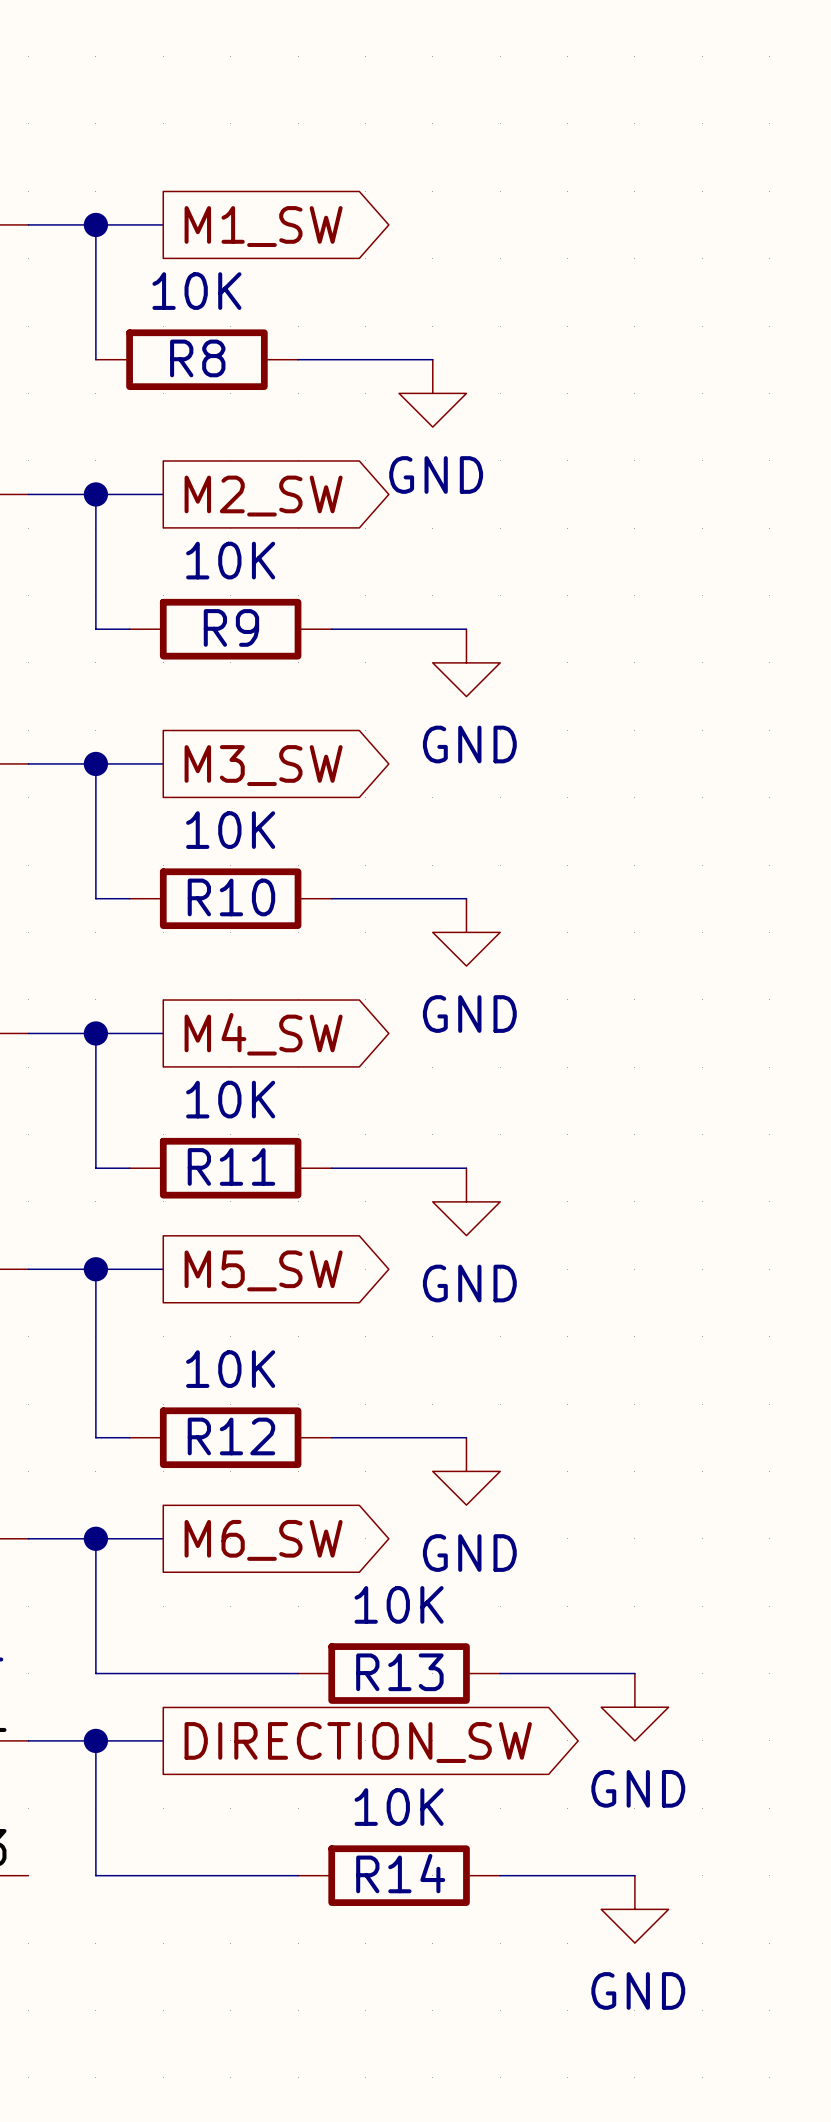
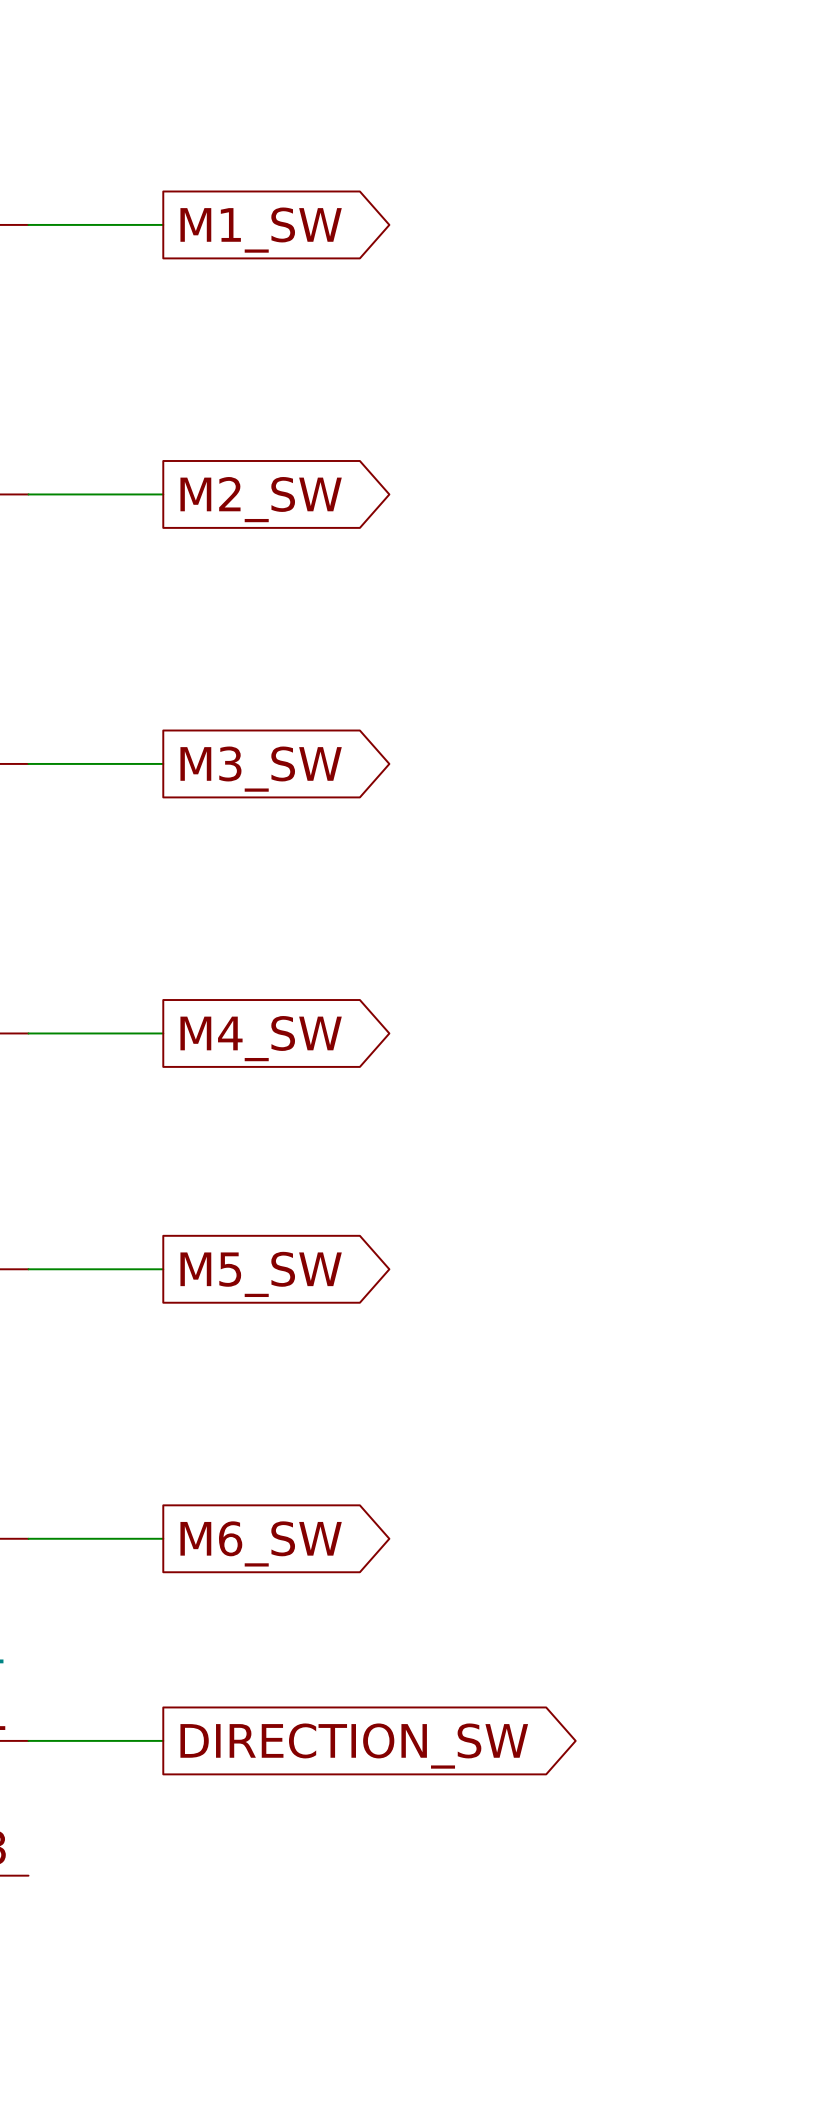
wire: (95, 224) (95, 359) -> none
junction: (95, 224) -> none
R8: 10K (196, 359) -> none
wire: (298, 359) (432, 359) -> none
power symbol: GND (432, 393) -> none
wire: (95, 494) (95, 629) (129, 629) -> none
junction: (95, 494) -> none
R9: 10K (230, 629) -> none
wire: (331, 629) (466, 629) -> none
power symbol: GND (466, 662) -> none
wire: (95, 763) (95, 898) (129, 898) -> none
junction: (95, 763) -> none
R10: 10K (230, 898) -> none
wire: (331, 898) (466, 898) -> none
power symbol: GND (466, 932) -> none
wire: (95, 1033) (95, 1168) (129, 1168) -> none
junction: (95, 1033) -> none
R11: 10K (230, 1168) -> none
wire: (331, 1168) (466, 1168) -> none
power symbol: GND (466, 1201) -> none
wire: (95, 1269) (95, 1437) (129, 1437) -> none
junction: (95, 1269) -> none
R12: 10K (230, 1437) -> none
wire: (331, 1437) (466, 1437) -> none
power symbol: GND (466, 1471) -> none
wire: (95, 1538) (95, 1673) (298, 1673) -> none
junction: (95, 1538) -> none
R13: 10K (399, 1673) -> none
wire: (500, 1673) (634, 1673) -> none
power symbol: GND (634, 1707) -> none
wire: (95, 1740) (95, 1875) (298, 1875) -> none
junction: (95, 1740) -> none
R14: 10K (399, 1875) -> none
wire: (500, 1875) (634, 1875) -> none
power symbol: GND (634, 1909) -> none

